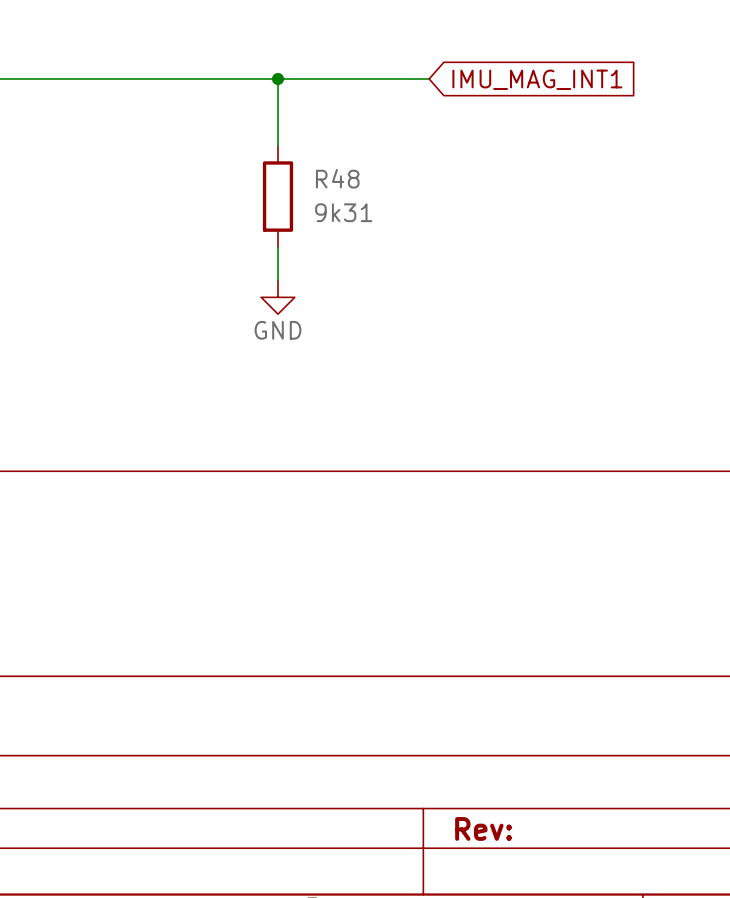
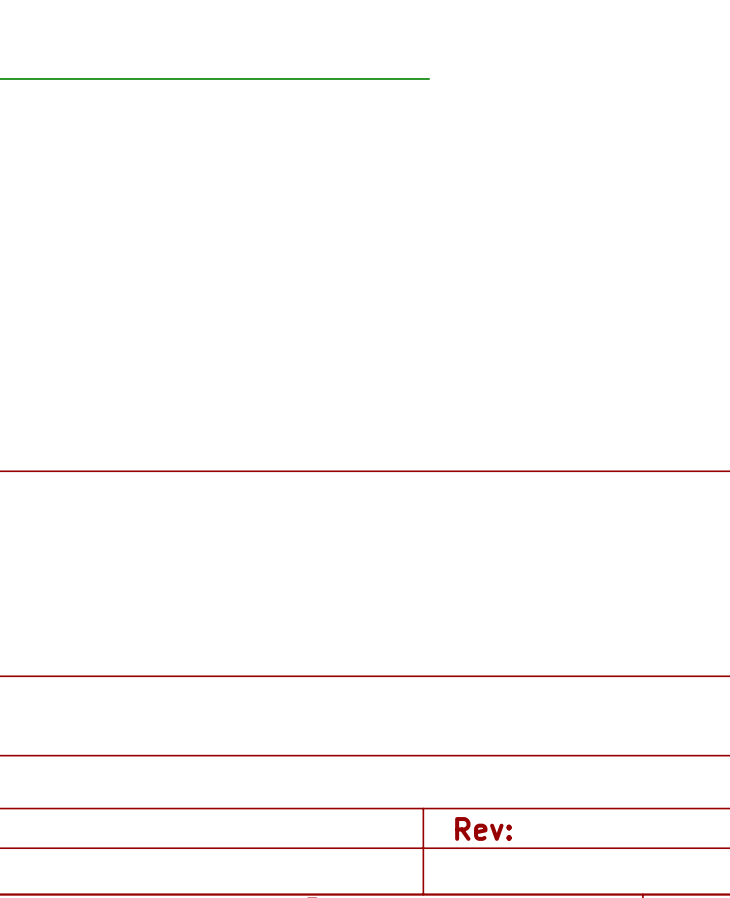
wire: (278, 78) (278, 146) -> none
junction: (278, 78) -> none
global label: IMU_MAG_INT1 (537, 79) -> none
R48: 9k31 (278, 196) -> none
wire: (278, 246) (278, 280) -> none
power symbol: GND (278, 297) -> none

